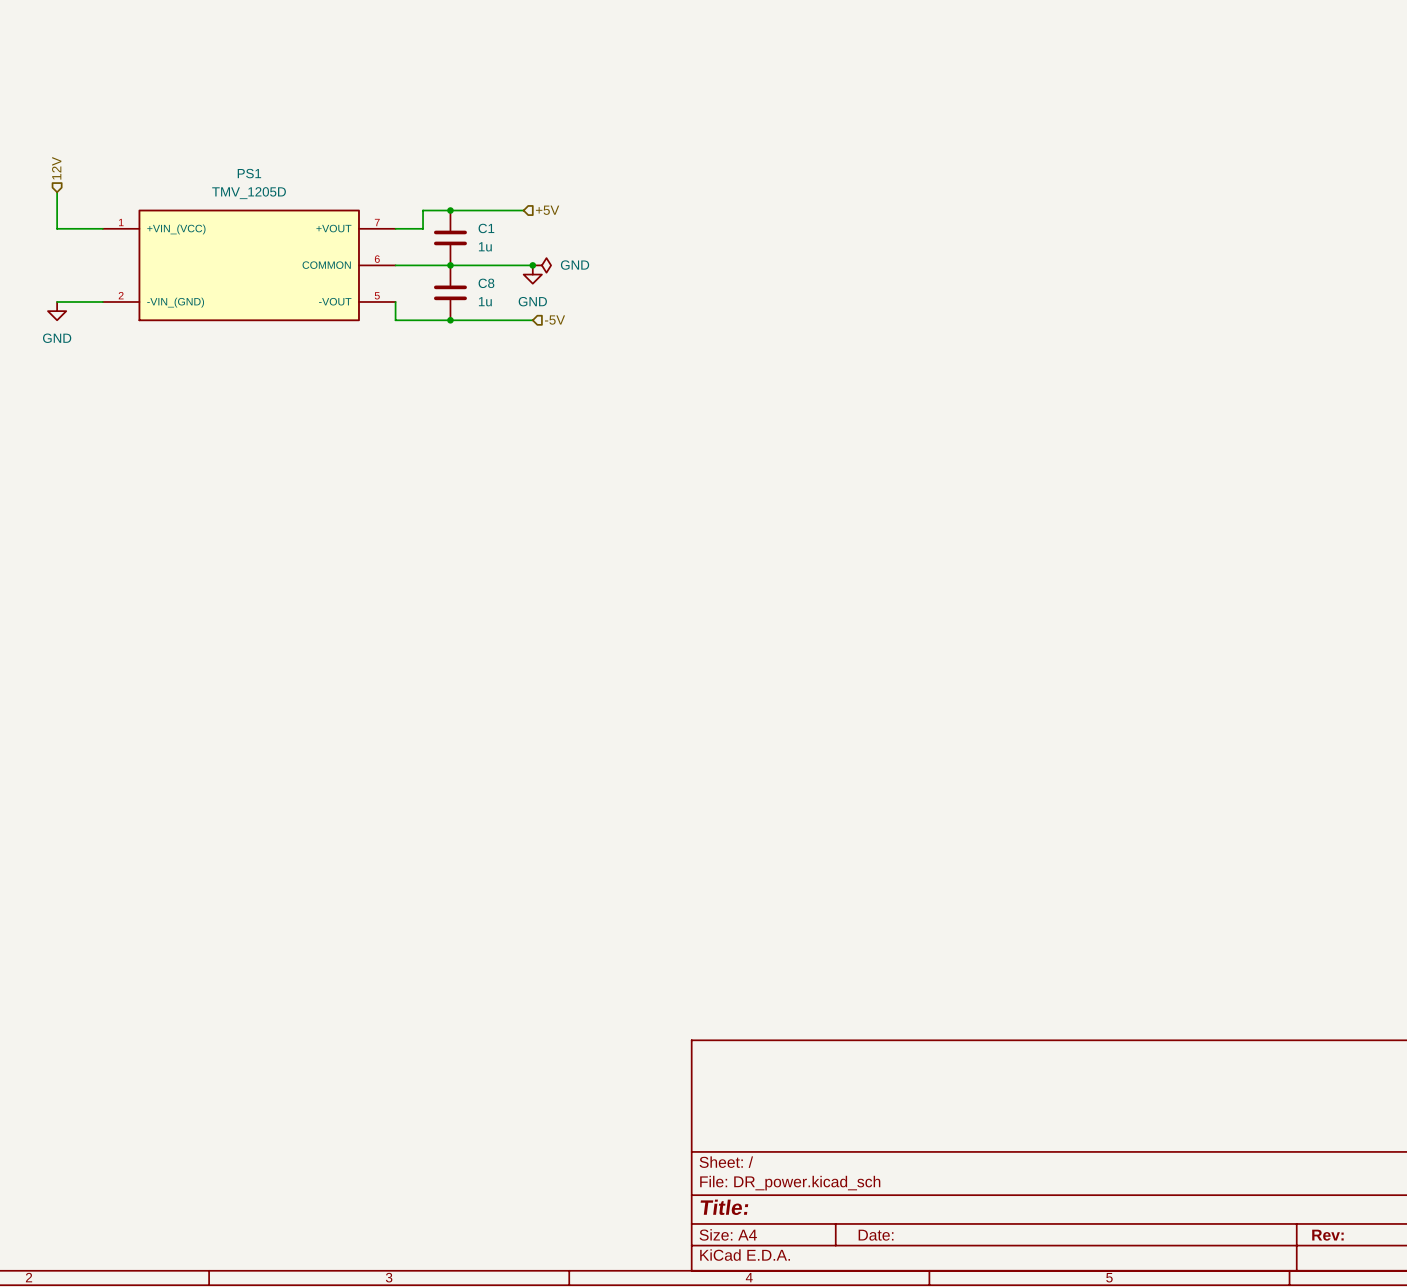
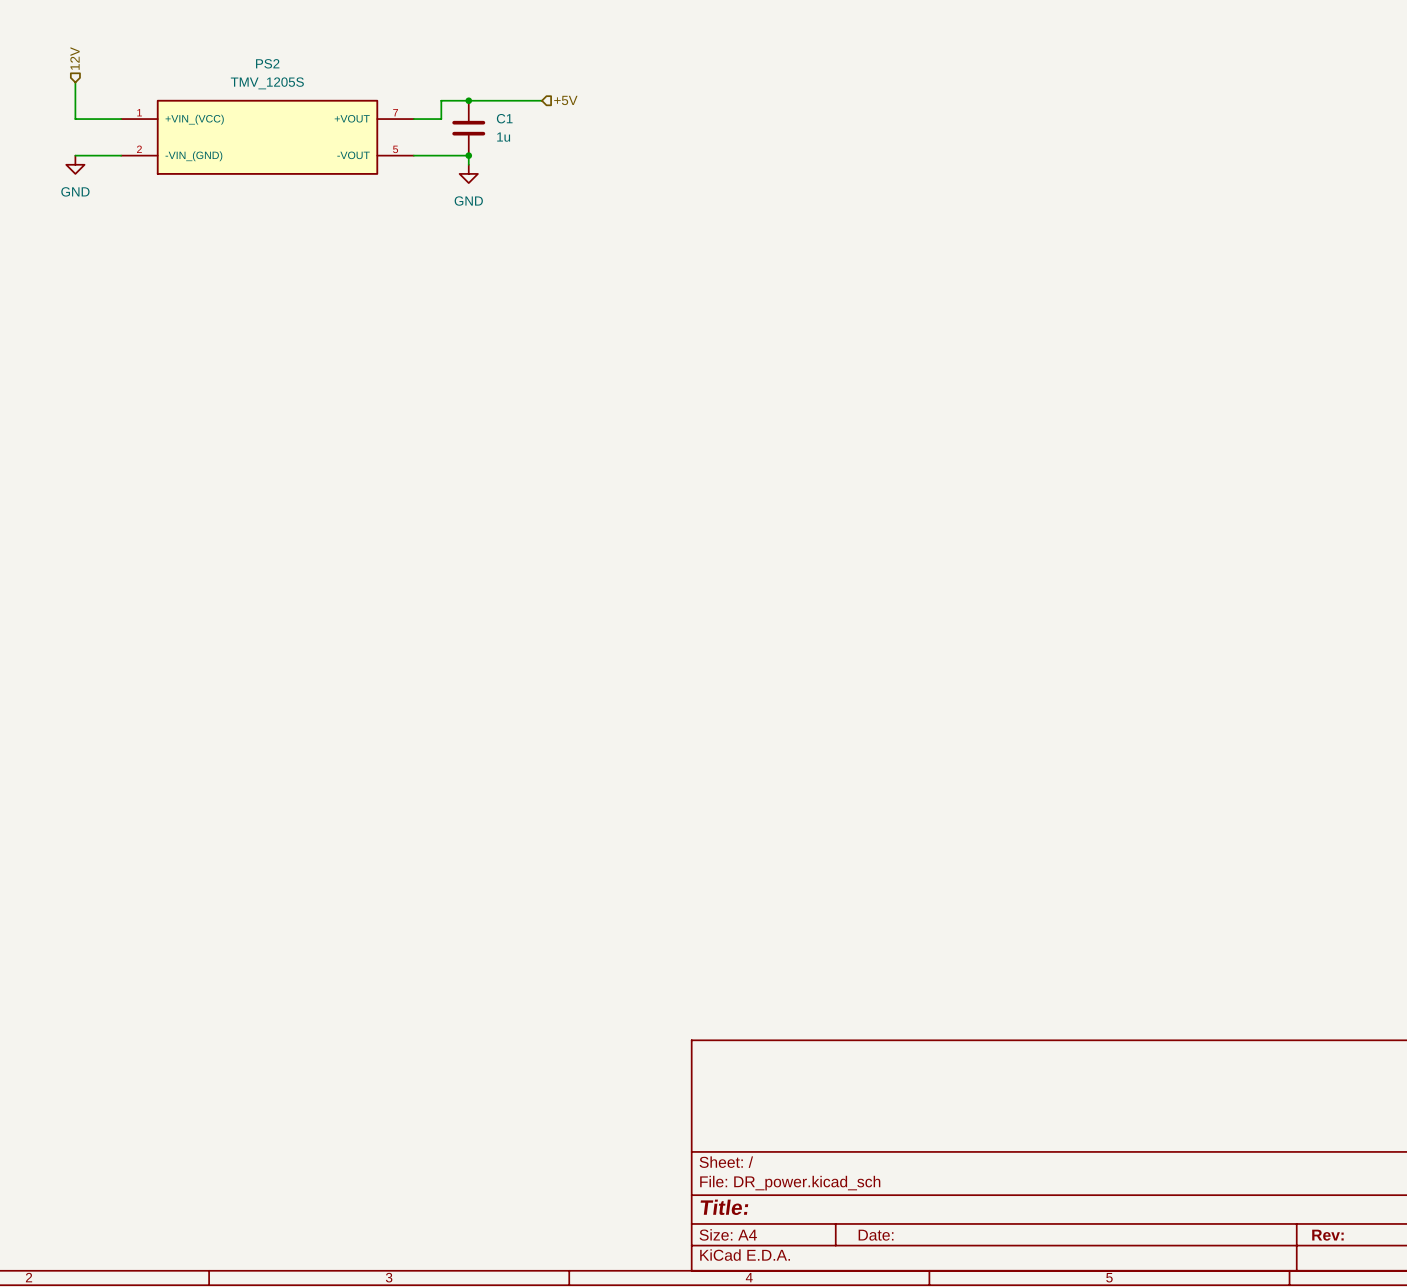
junction: none -> (468, 100)
PS2: none -> TMV_1205S (267, 137)
wire: none -> (413, 155) (468, 155) (468, 164)
junction: none -> (468, 155)
hierarchical label position: 12V (56, 168) -> 12V (74, 58)
wire: (57, 192) (57, 228) (102, 228) -> (75, 82) (75, 119) (121, 119)
junction: (450, 210) -> none
wire: (523, 210) (423, 210) (423, 228) (395, 228) -> (541, 100) (441, 100) (441, 119) (413, 119)
hierarchical label position: +5V (547, 210) -> +5V (565, 100)
C1 position: (450, 237) -> (468, 128)
PS1: TMV_1205D (249, 265) -> none
wire: (395, 265) (532, 265) -> none
junction: (450, 265) -> none
junction: (532, 265) -> none
power symbol: GND (541, 265) -> none
power symbol position: GND (532, 274) -> GND (468, 173)
C8: 1u (450, 292) -> none
wire: (57, 301) (102, 301) -> (75, 155) (121, 155)
wire: (395, 301) (395, 320) (532, 320) -> none
power symbol position: GND (57, 311) -> GND (75, 164)
junction: (450, 320) -> none
hierarchical label: -5V (555, 320) -> none

